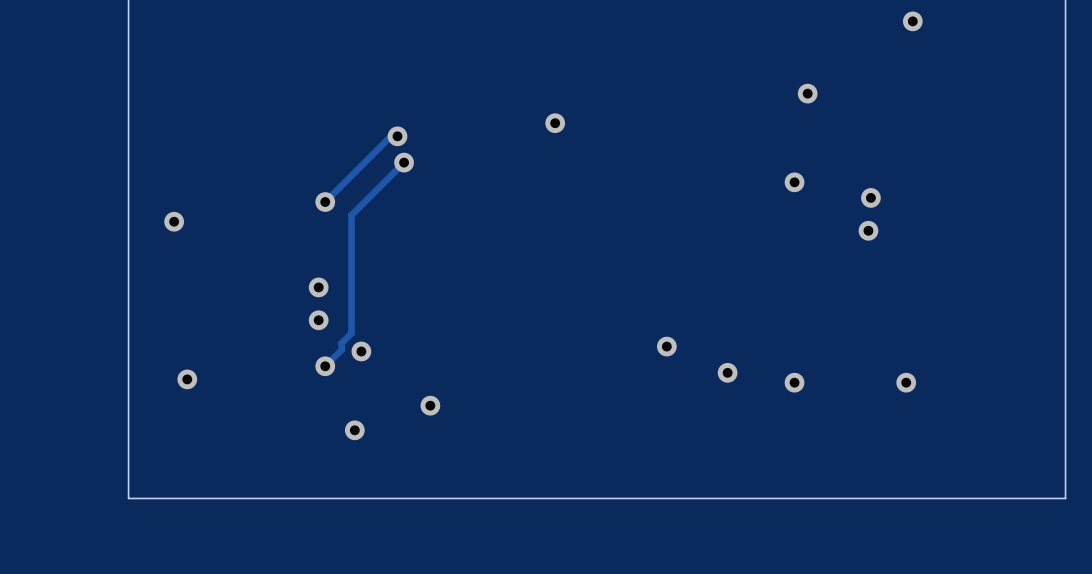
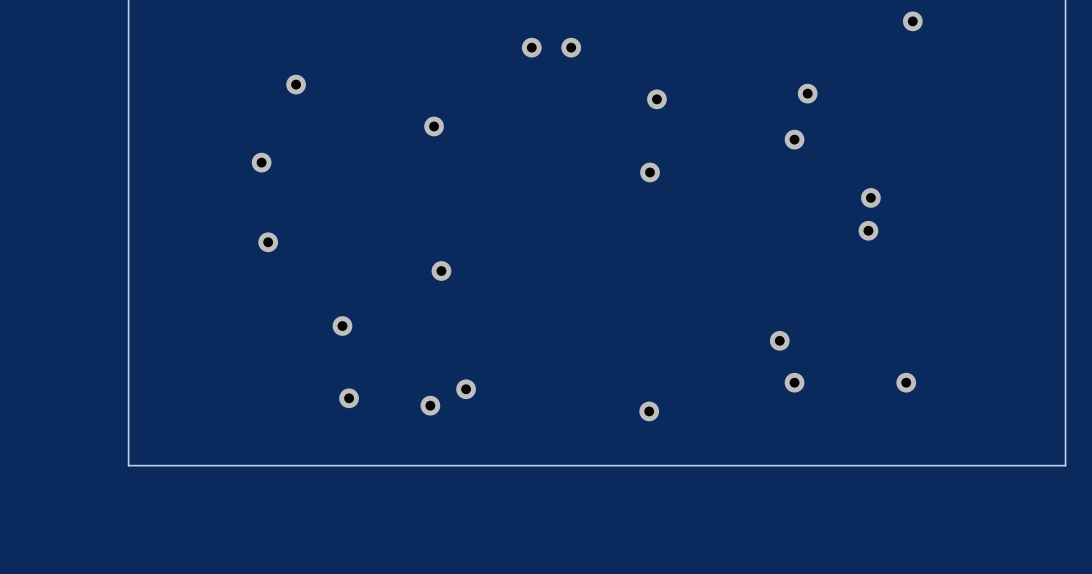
via: none -> (531, 47)
via: none -> (571, 47)
via: none -> (296, 84)
via: none -> (656, 99)
via: (555, 123) -> none
via: none -> (434, 126)
track: (397, 136) (390, 136) (325, 202) -> none
via: (397, 136) -> none
via: none -> (261, 162)
track: (404, 162) (351, 215) (351, 333) (341, 343) (341, 349) (325, 366) -> none
via: (404, 162) -> none
via: none -> (650, 172)
via position: (794, 182) -> (794, 139)
via: (325, 202) -> none
via: (174, 221) -> none
via: none -> (268, 242)
via: none -> (441, 271)
via: (318, 287) -> none
via: (318, 320) -> none
via: none -> (342, 326)
via: none -> (779, 340)
via: (666, 346) -> none
via: (361, 351) -> none
via: (325, 366) -> none
via: (727, 372) -> none
via: (187, 379) -> none
via: none -> (466, 389)
via: none -> (349, 398)
via: none -> (649, 411)
via: (354, 430) -> none
board edge: (1065, 465) (1065, 498) (128, 498) (128, 465) -> (1065, 465) (128, 465)

